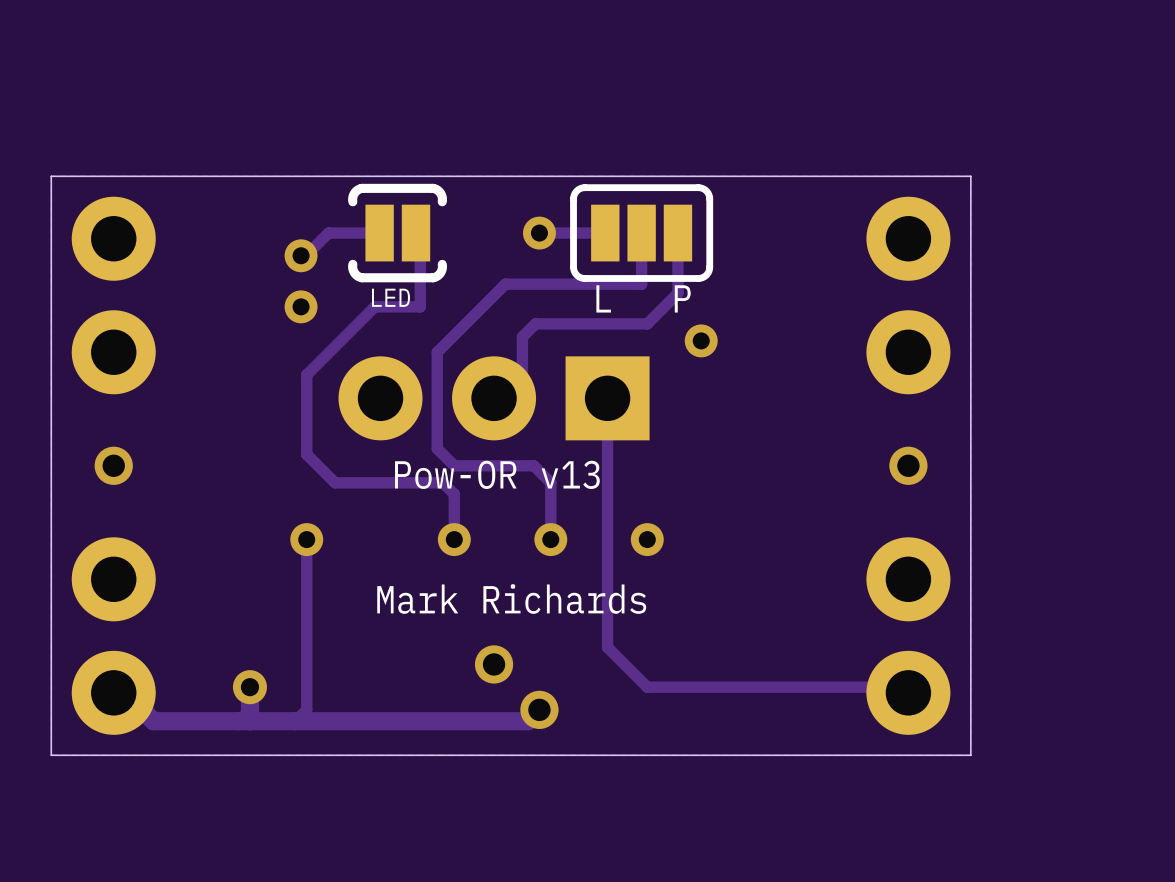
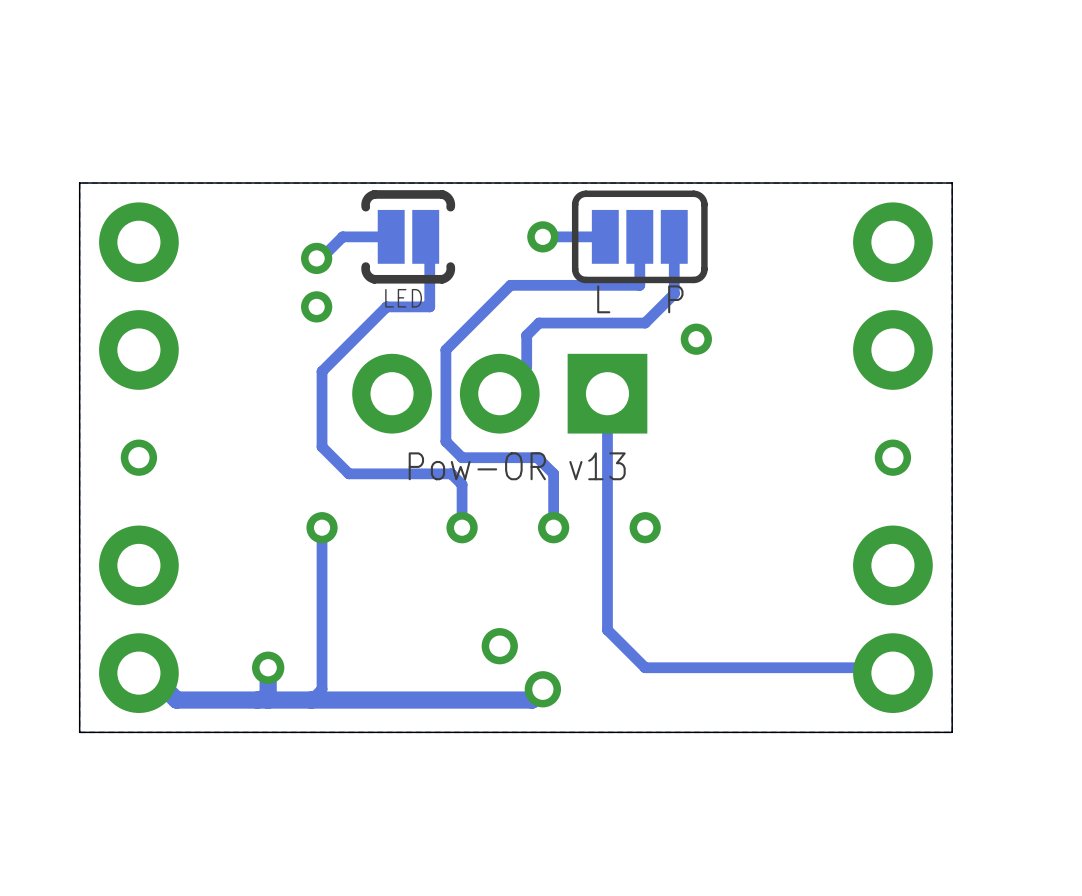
text: Mark Richards (511, 599) -> none

